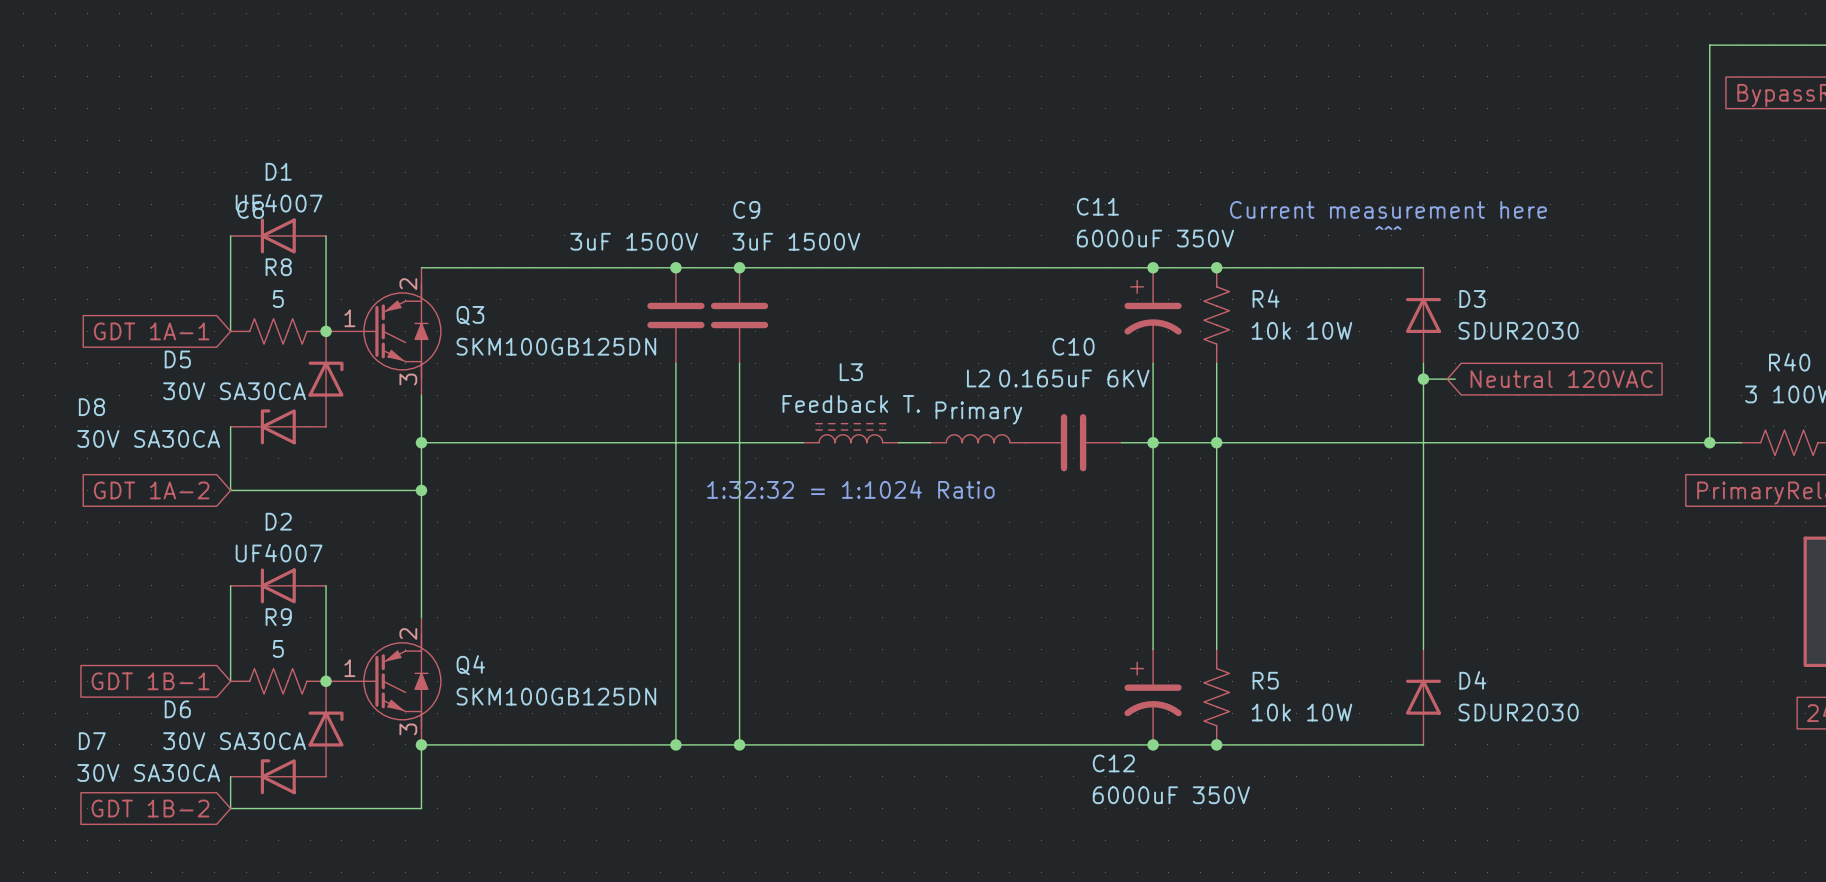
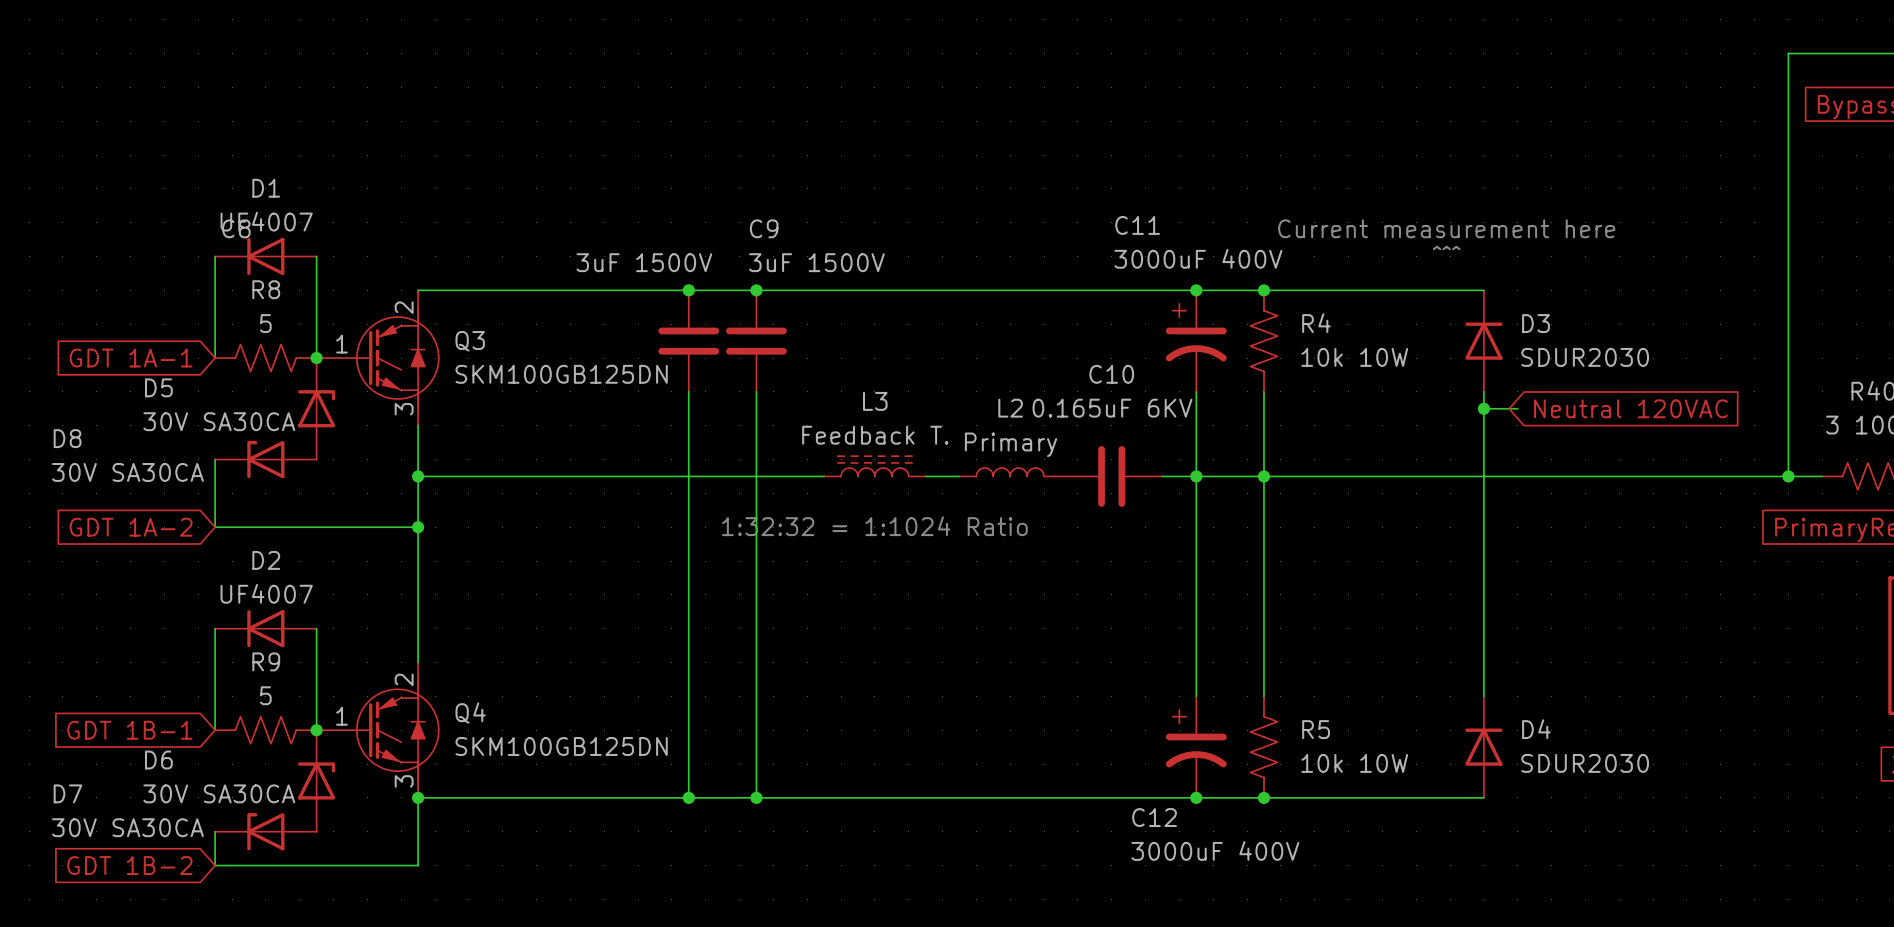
C11 value: 6000uF 350V (1155, 238) -> 3000uF 400V (1198, 258)
C12 value: 6000uF 350V (1171, 795) -> 3000uF 400V (1215, 850)

